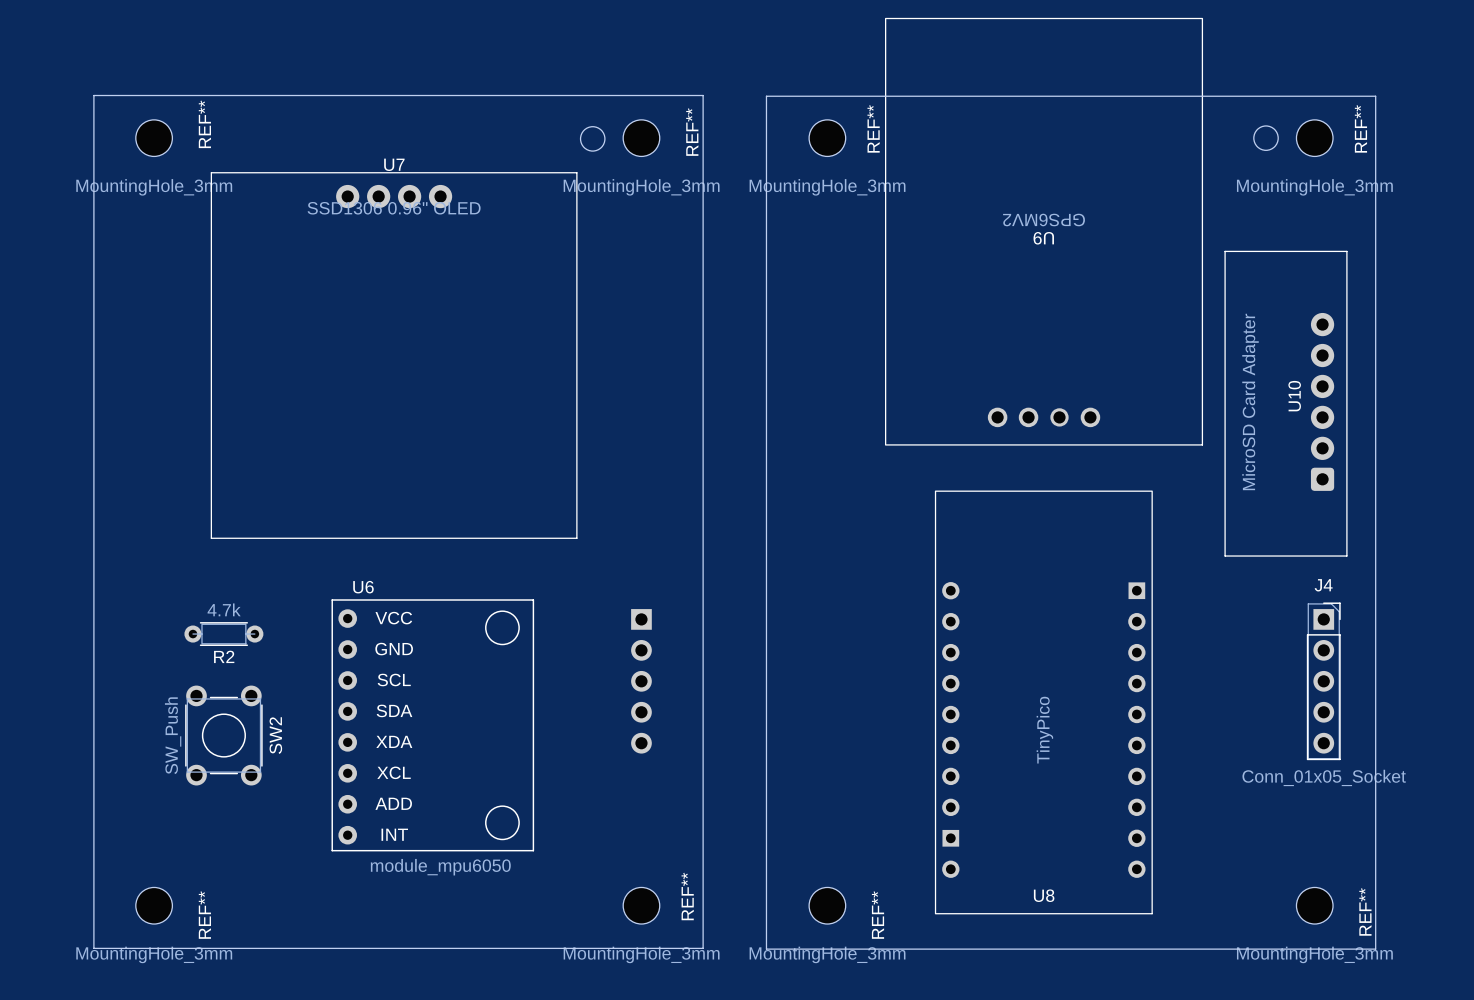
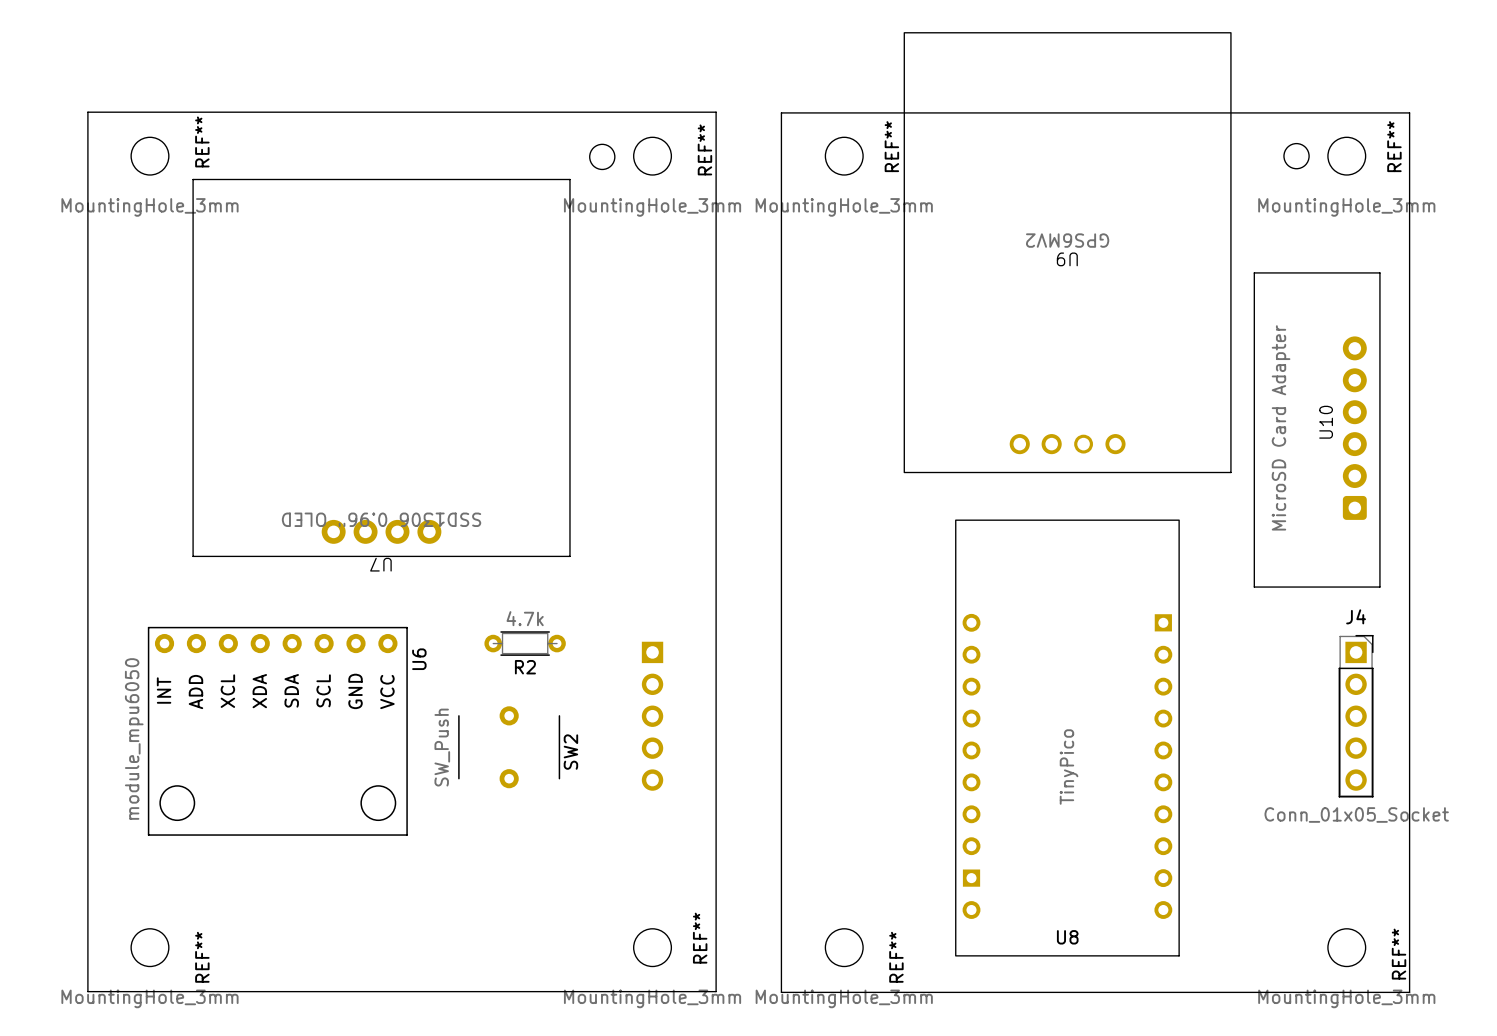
U7 rotation: 0° (394, 355) -> 180° (381, 367)
R2 position: (223, 634) -> (525, 643)
SW2 footprint: [185, 685, 263, 786] -> [458, 706, 561, 789]
U6 rotation: 0° (432, 725) -> 90° clockwise (277, 731)
U6 position: (432, 725) -> (277, 731)

